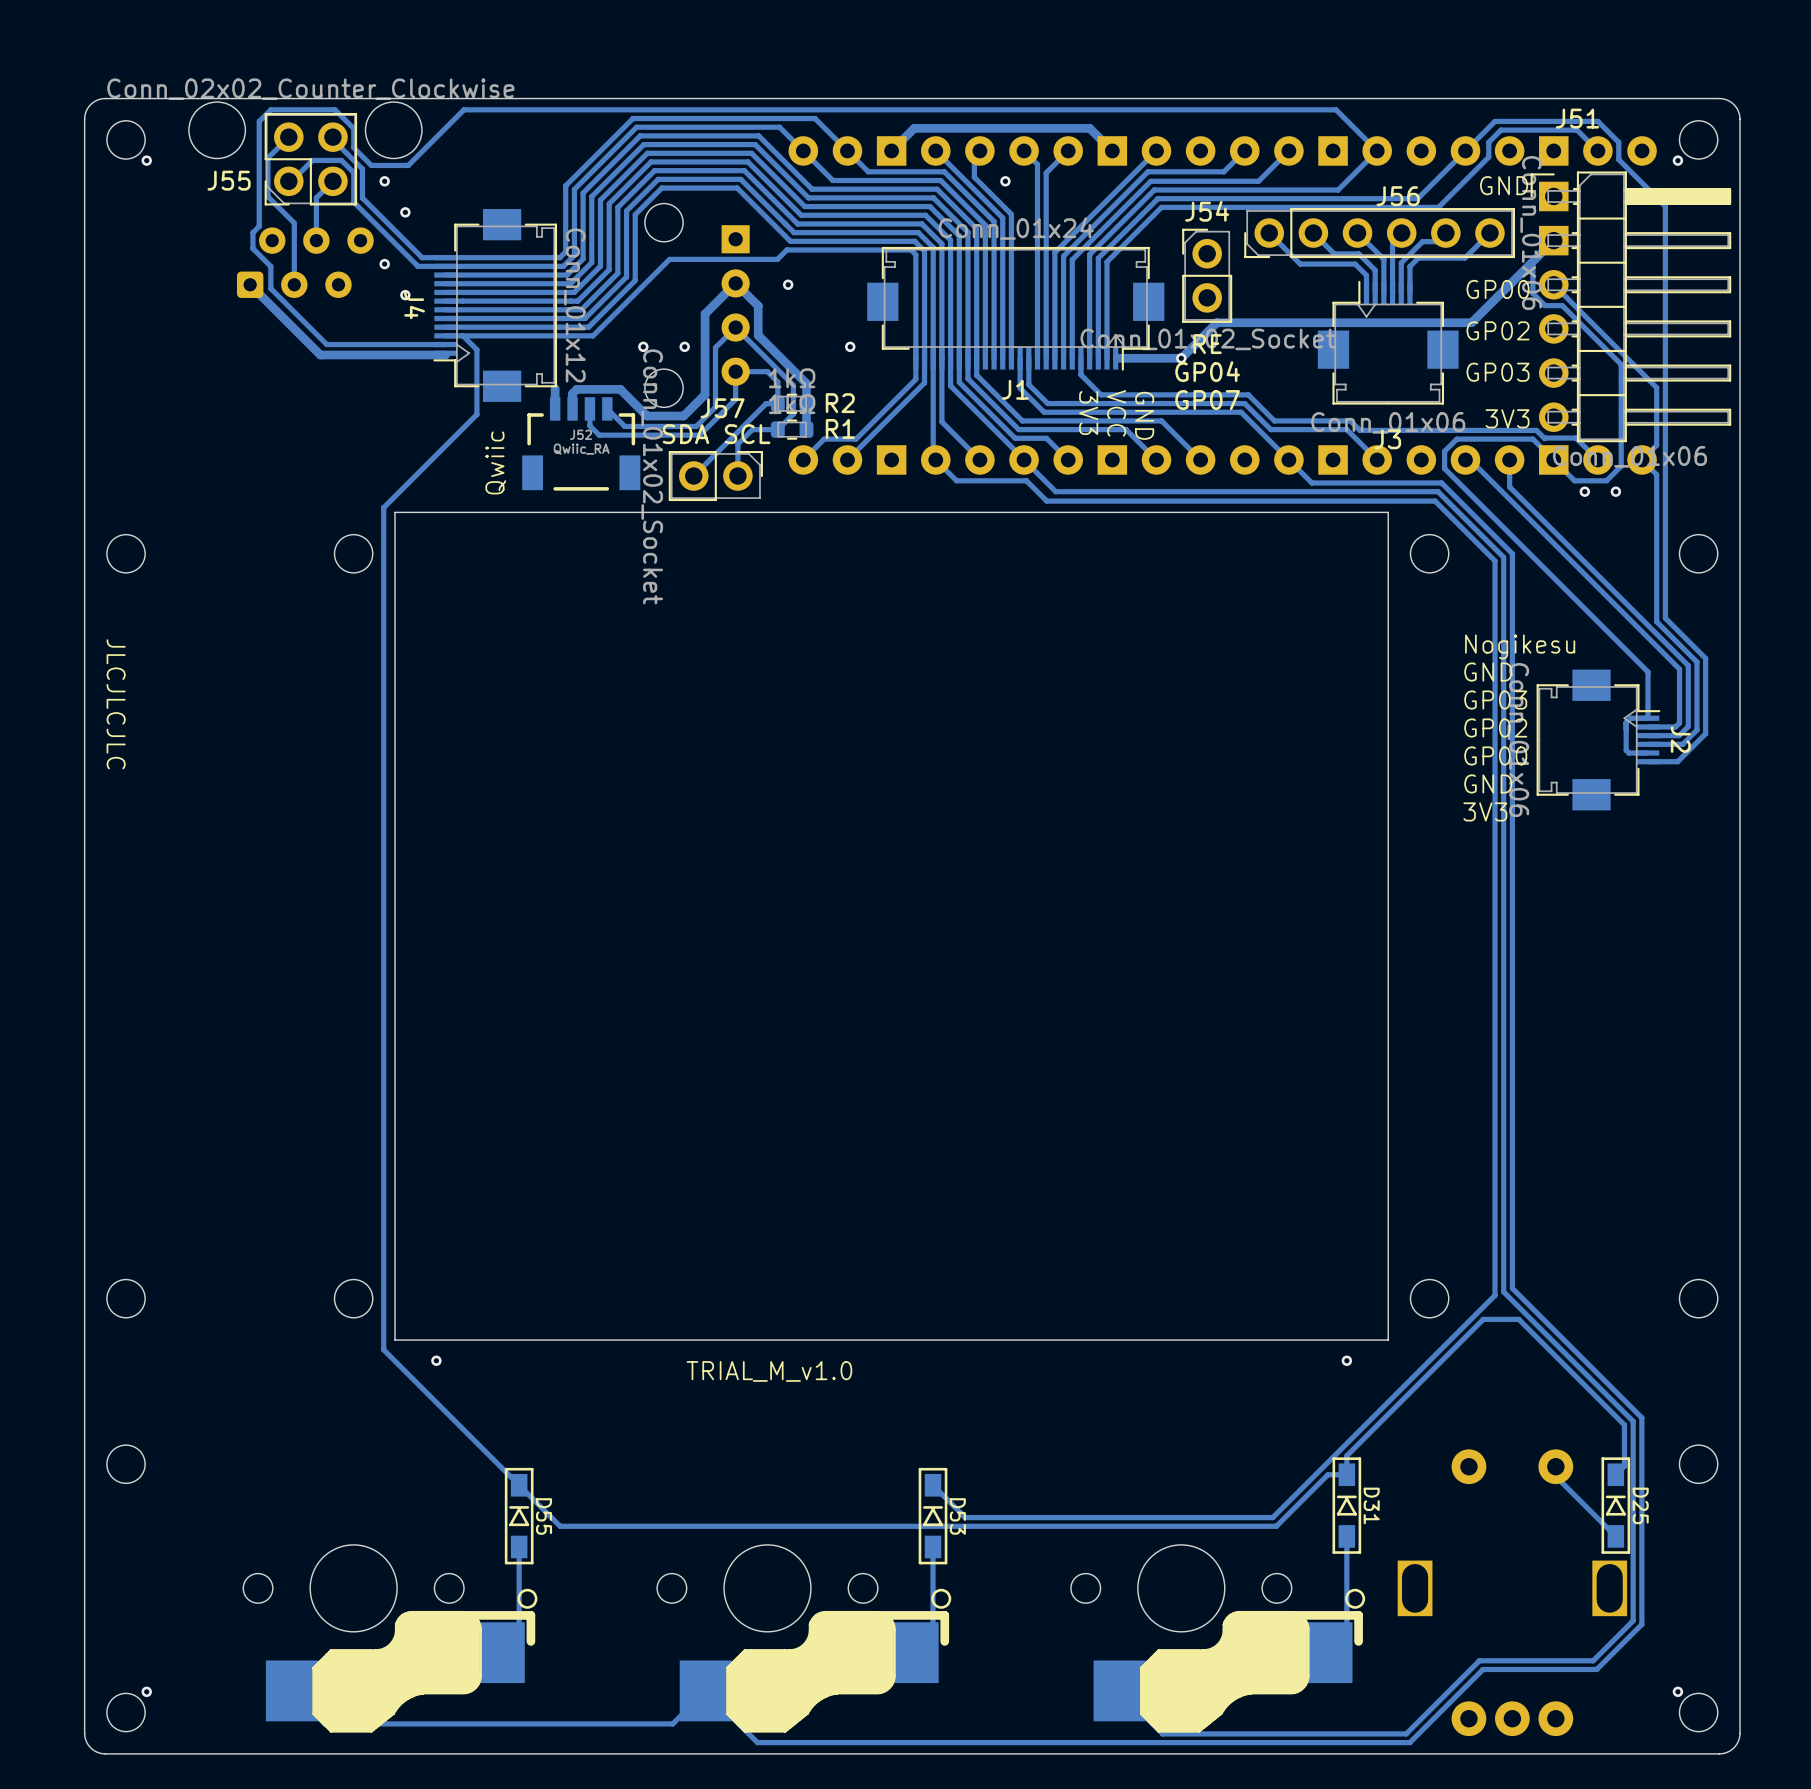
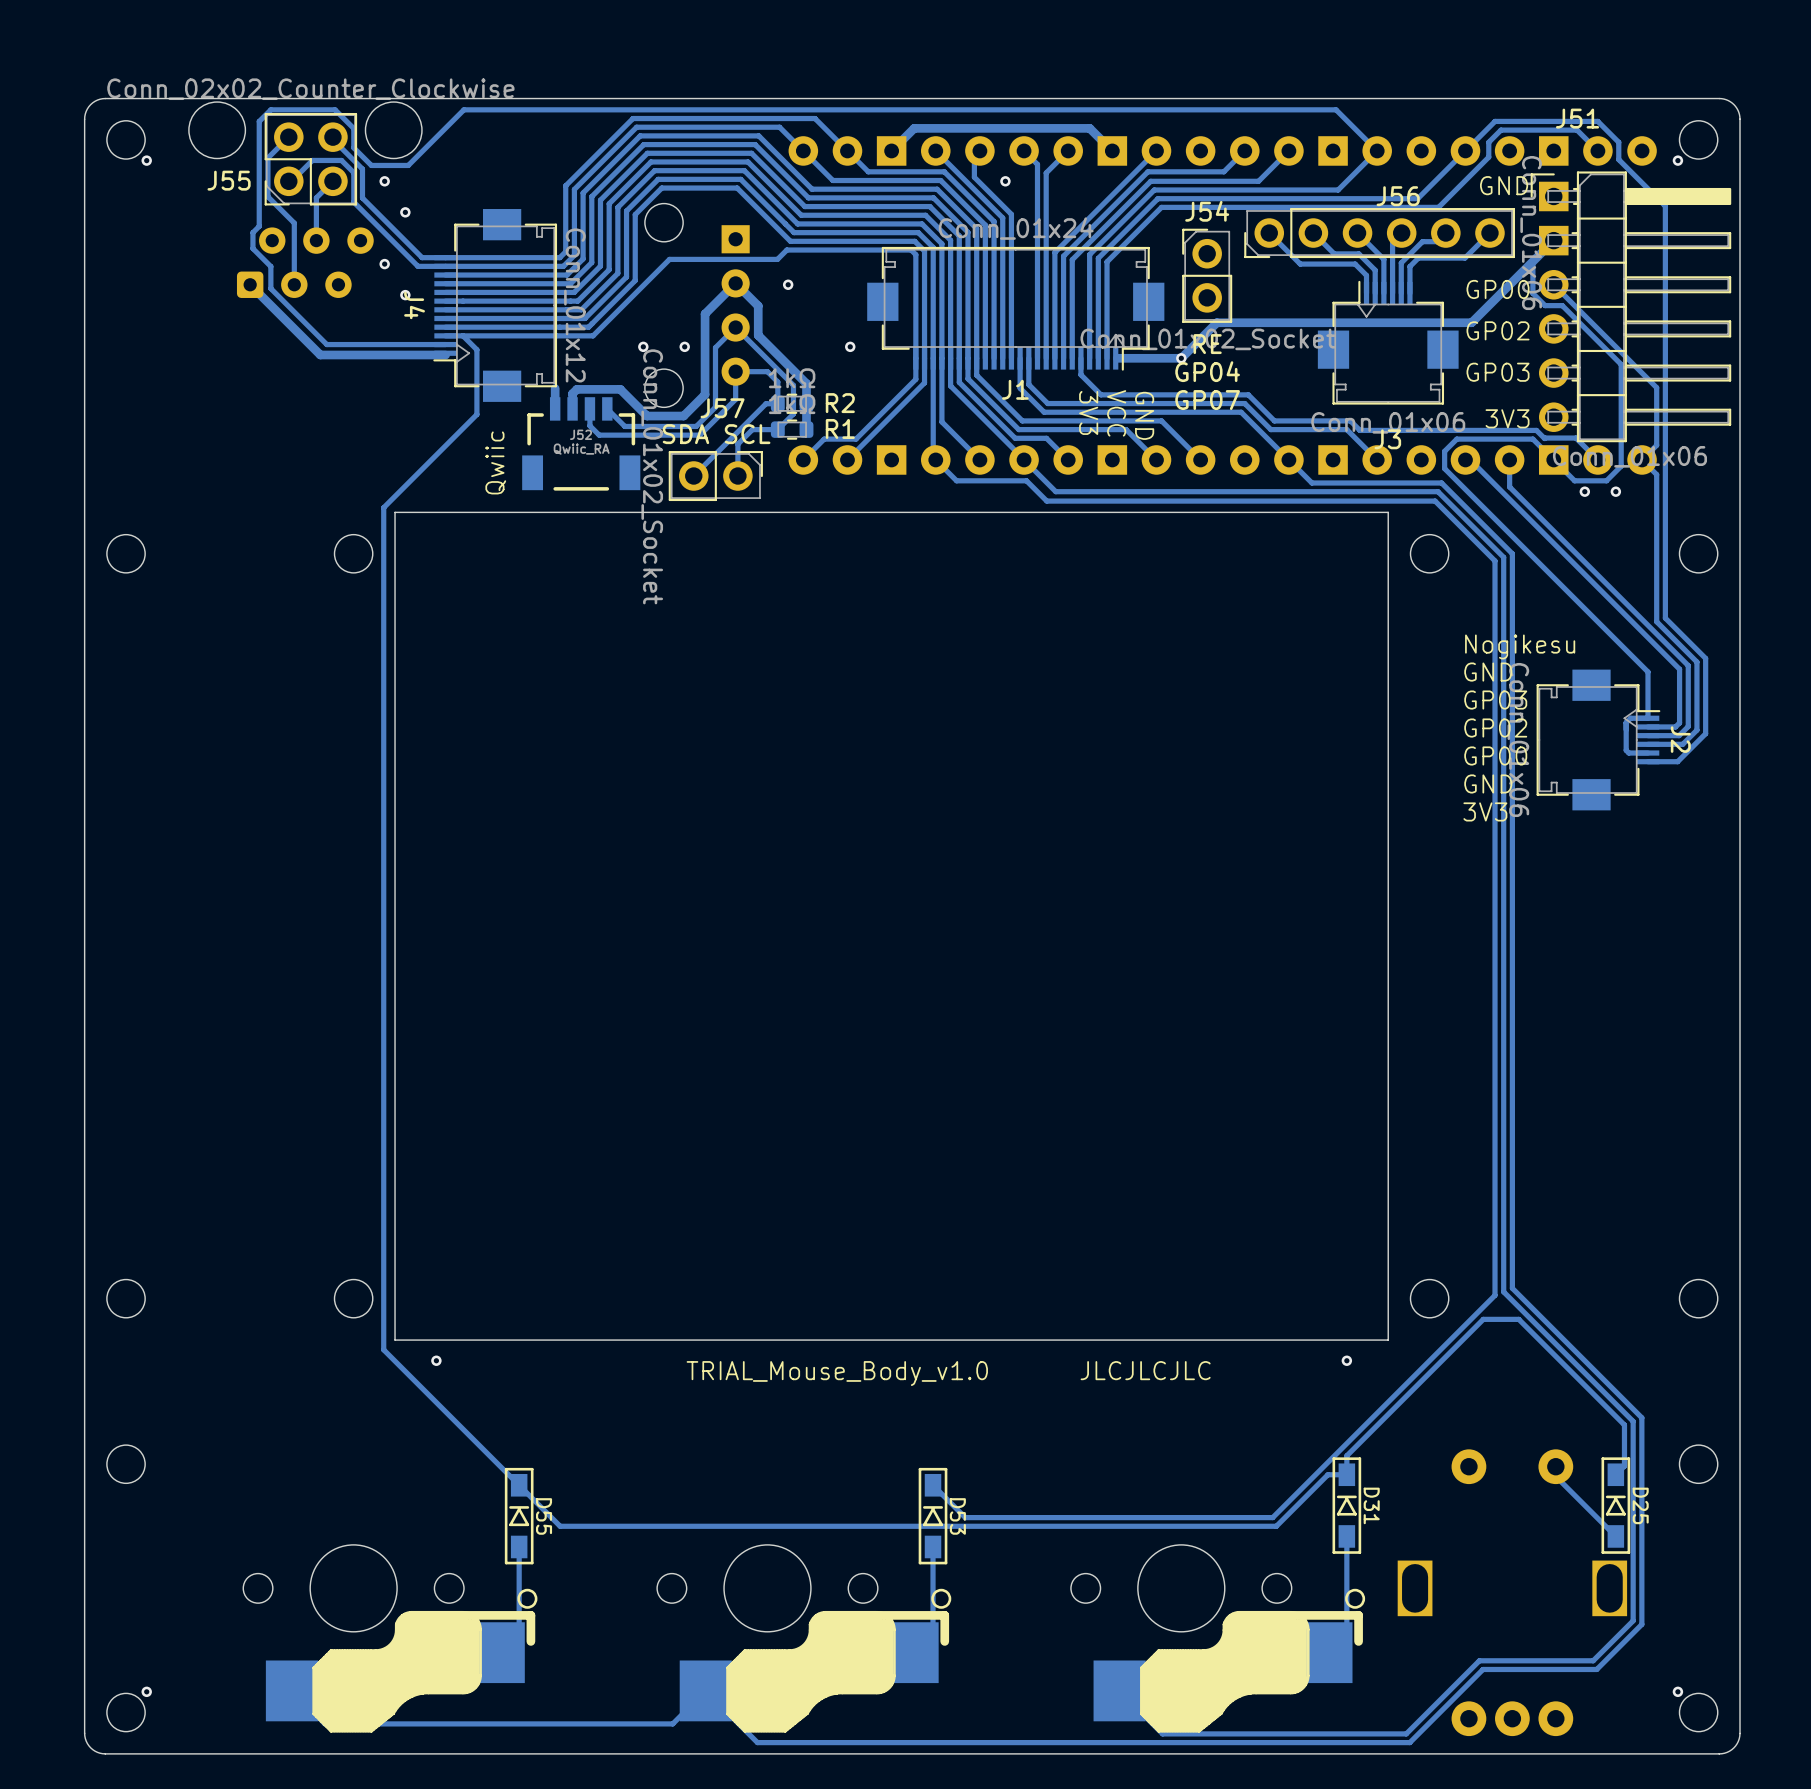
text: JLCJLCJLC (116, 704) -> none
text: none -> JLCJLCJLC (1145, 1370)
text: TRIAL_M_v1.0 (769, 1371) -> TRIAL_Mouse_Body_v1.0 (837, 1373)

